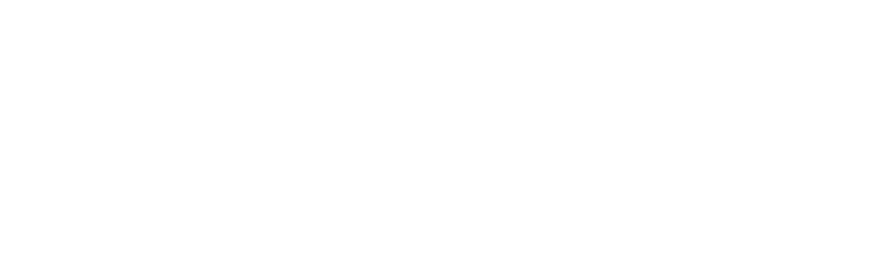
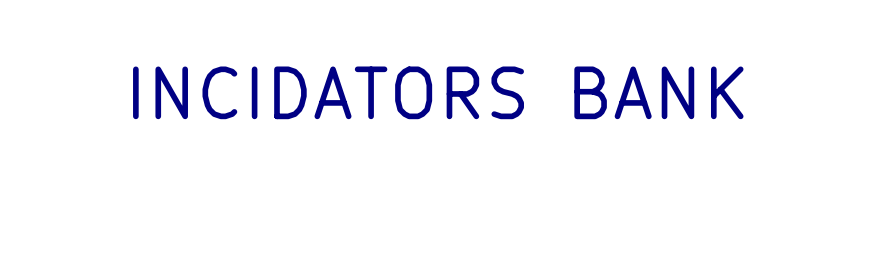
text: none -> INCIDATORS BANK (438, 92)

